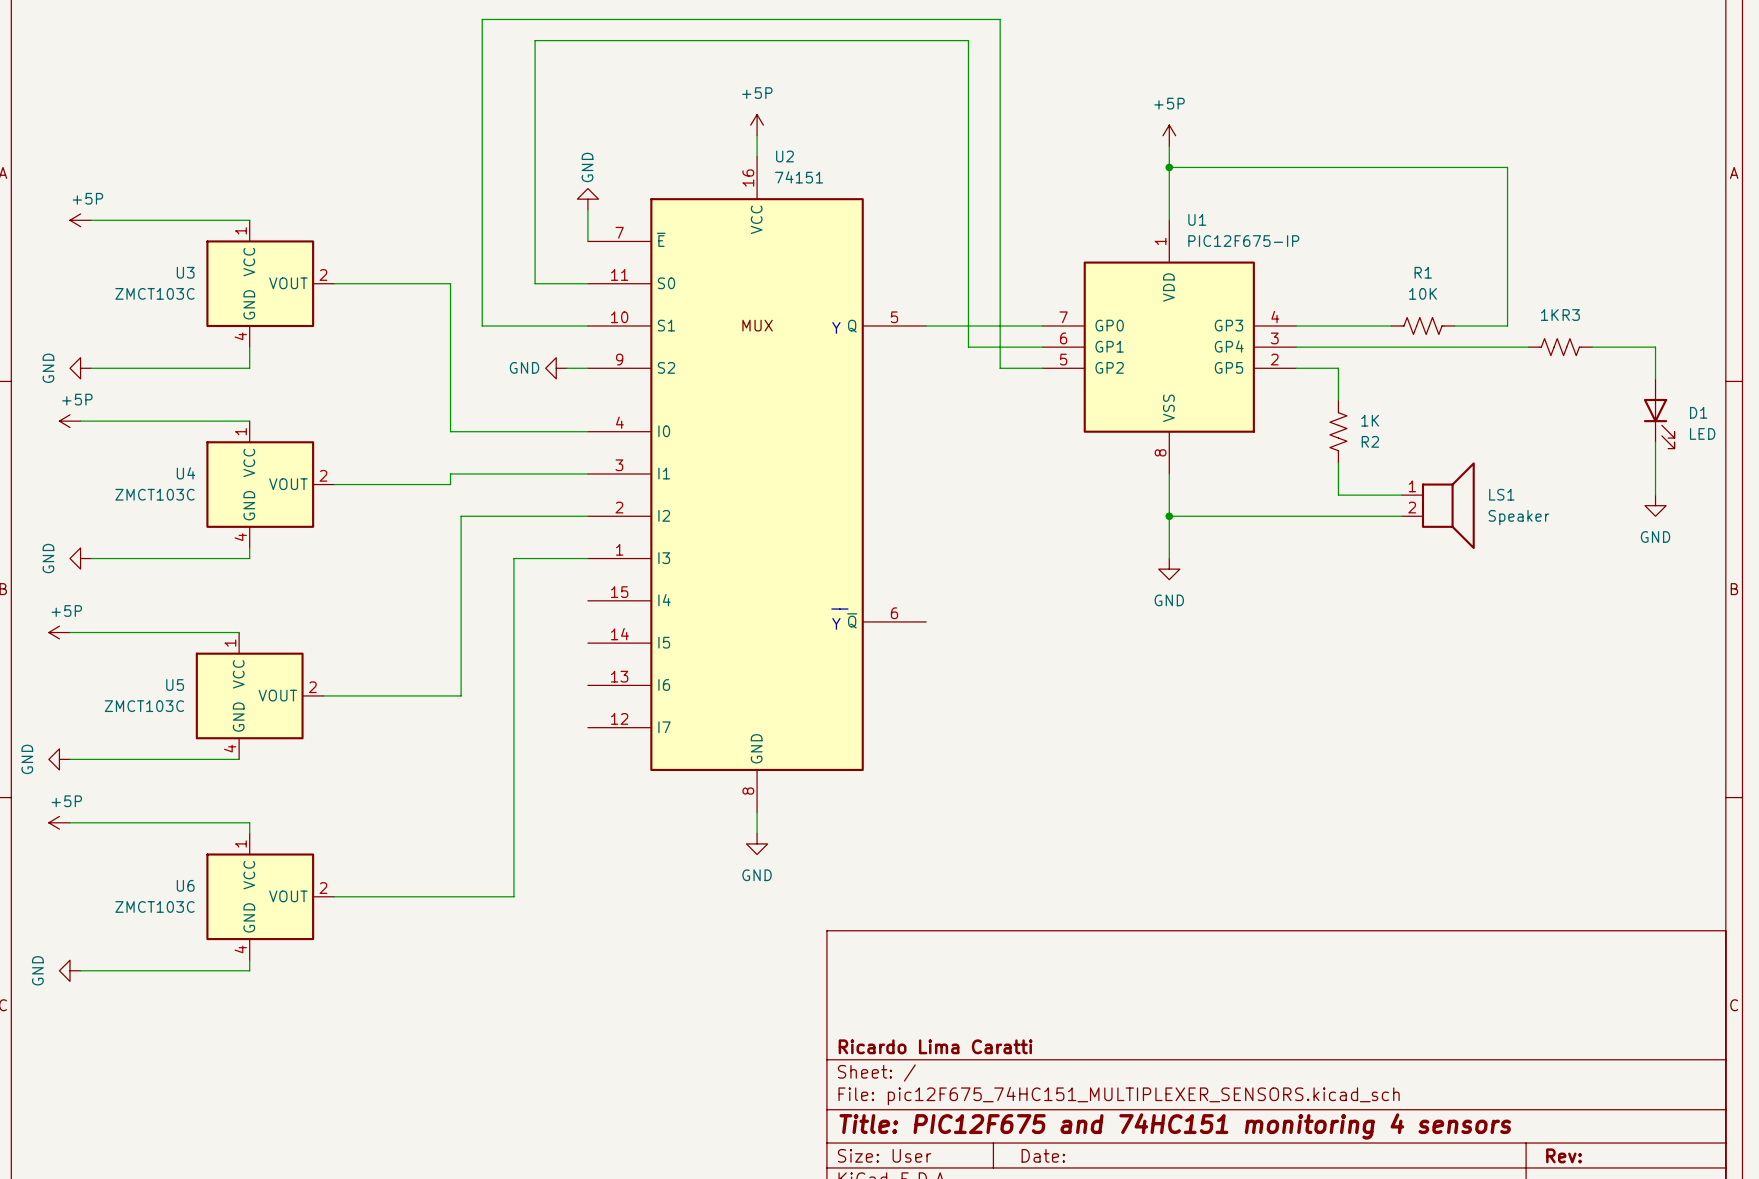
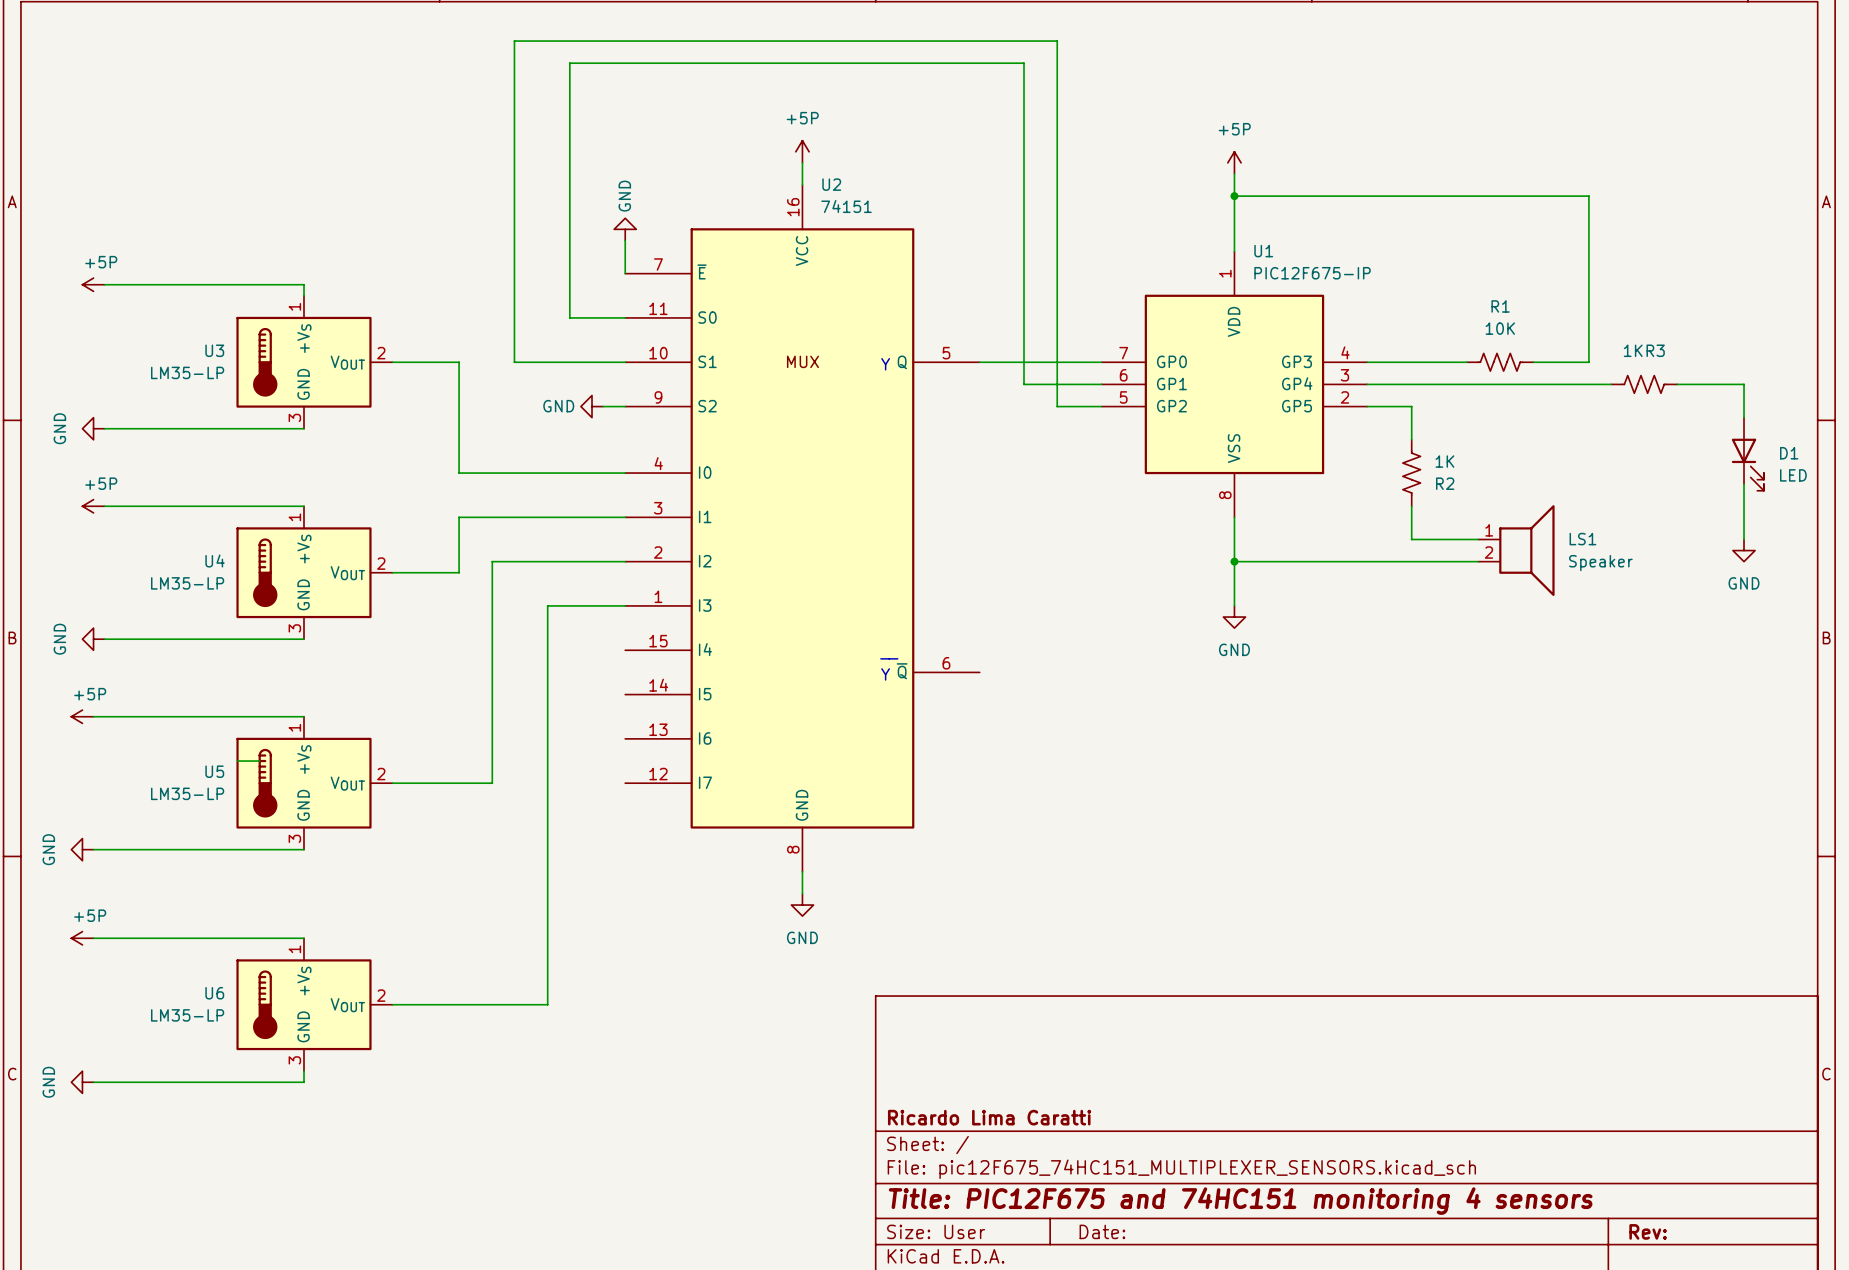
power symbol position: +5P (80, 220) -> +5P (93, 284)
wire: (91, 220) (249, 220) -> none
U3 symbol: [206, 220, 335, 348] -> [236, 295, 393, 429]
wire: none -> (104, 284) (303, 284) (303, 295)
wire: (334, 283) (450, 283) (450, 431) -> (392, 362) (459, 362) (459, 473) (481, 473)
U3 value: ZMCT103C (154, 293) -> LM35-LP (187, 372)
wire: (249, 347) (249, 368) (91, 368) -> none
power symbol position: GND (80, 368) -> GND (93, 428)
wire: none -> (104, 428) (303, 428)
power symbol position: +5P (69, 421) -> +5P (93, 506)
wire: (80, 421) (249, 421) -> none
U4 symbol: [206, 421, 335, 548] -> [236, 506, 393, 640]
wire: none -> (104, 506) (303, 506)
wire: (450, 473) (450, 484) (334, 484) -> (481, 517) (459, 517) (459, 572) (392, 572)
U4 value: ZMCT103C (154, 494) -> LM35-LP (187, 583)
wire: (249, 547) (249, 558) (91, 558) -> none
power symbol position: GND (80, 558) -> GND (93, 639)
wire: none -> (104, 639) (303, 639)
power symbol position: +5P (59, 632) -> +5P (82, 716)
wire: (69, 632) (239, 632) -> none
U5 symbol: [195, 632, 324, 760] -> [236, 716, 393, 850]
wire: none -> (93, 716) (303, 716)
wire: (323, 695) (461, 695) -> (392, 783) (492, 783) (492, 749)
U5 value: ZMCT103C (144, 706) -> LM35-LP (187, 793)
power symbol position: GND (59, 759) -> GND (82, 849)
wire: (69, 759) (239, 759) -> none
wire: none -> (93, 849) (303, 849)
power symbol position: +5P (59, 822) -> +5P (82, 938)
wire: (69, 822) (249, 822) (249, 833) -> none
U6 symbol: [206, 833, 335, 961] -> [236, 938, 393, 1072]
wire: none -> (93, 938) (303, 938)
wire: (334, 896) (513, 896) -> (392, 1004) (547, 1004) (547, 960)
U6 value: ZMCT103C (154, 906) -> LM35-LP (187, 1015)
wire: (249, 960) (249, 970) (80, 970) -> none
power symbol position: GND (69, 970) -> GND (82, 1082)
wire: none -> (303, 1071) (303, 1082) (93, 1082)

